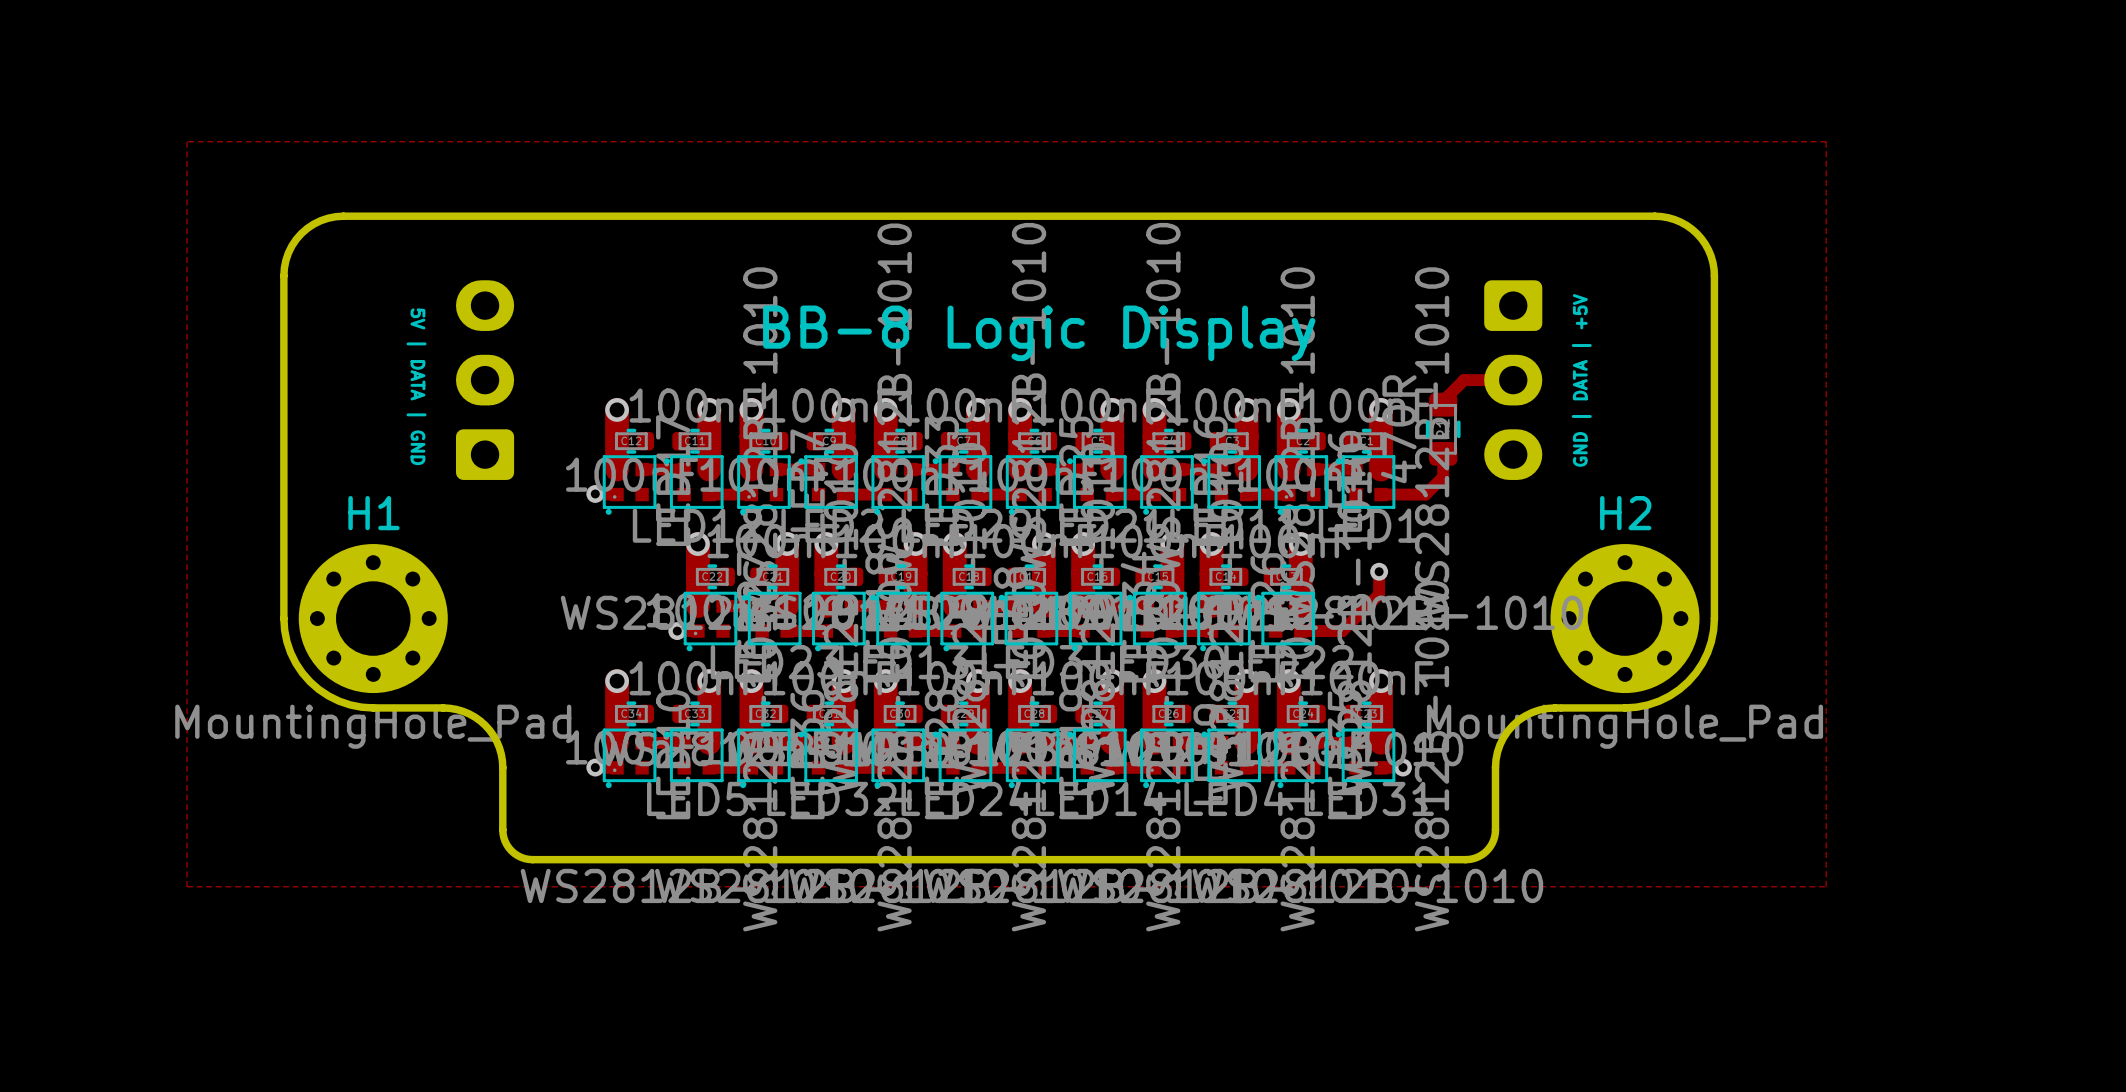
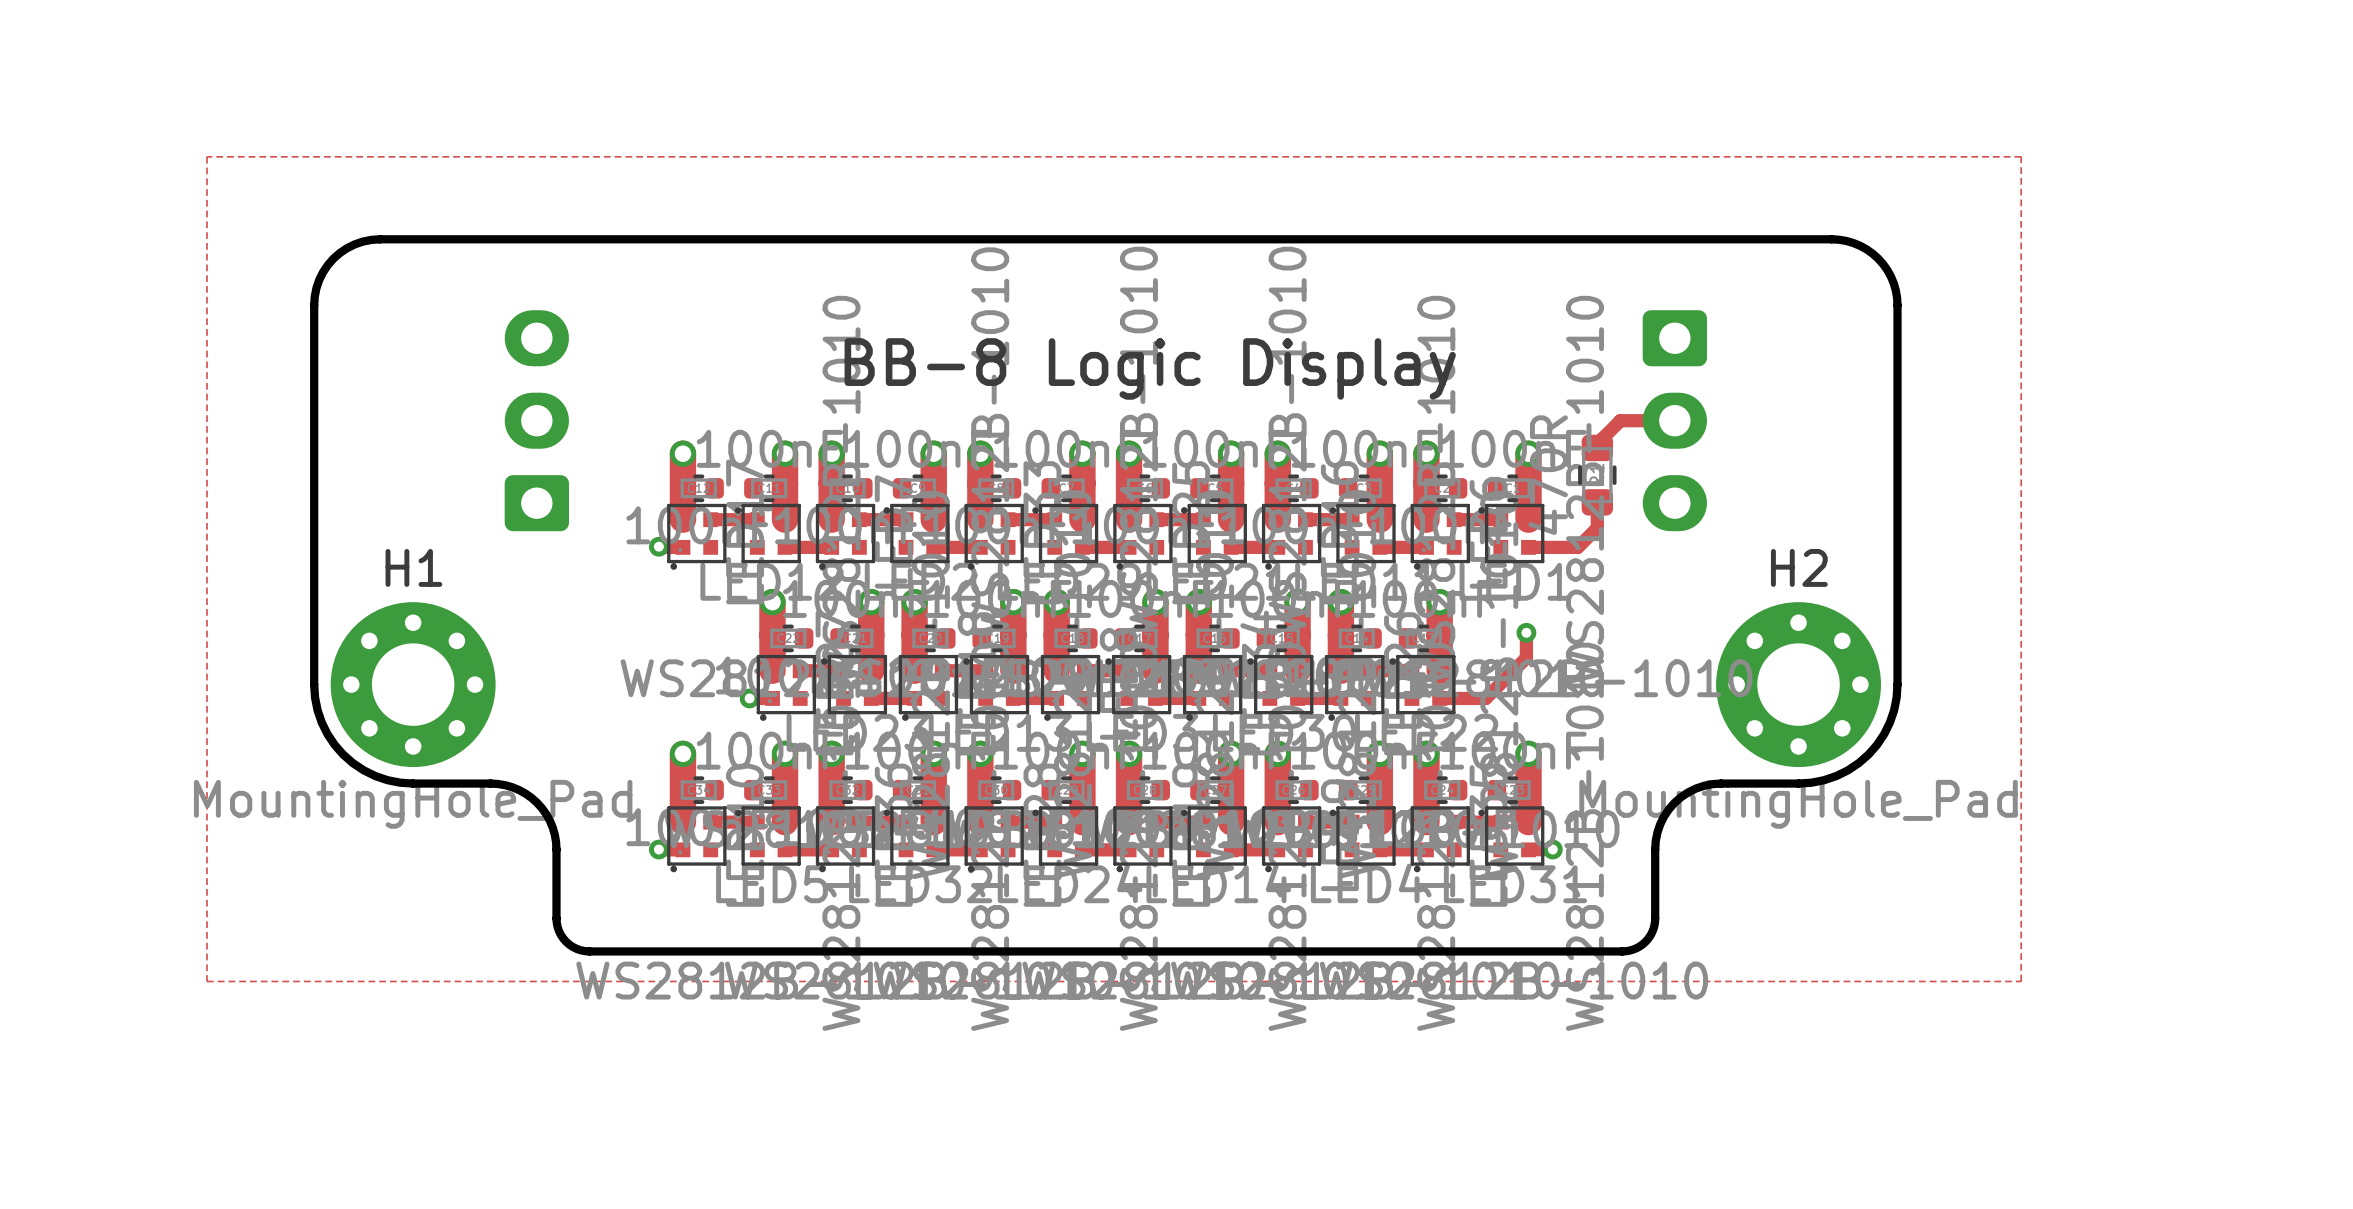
text: GND | DATA | +5V (1581, 380) -> none
text: 5V | DATA | GND (416, 386) -> none

